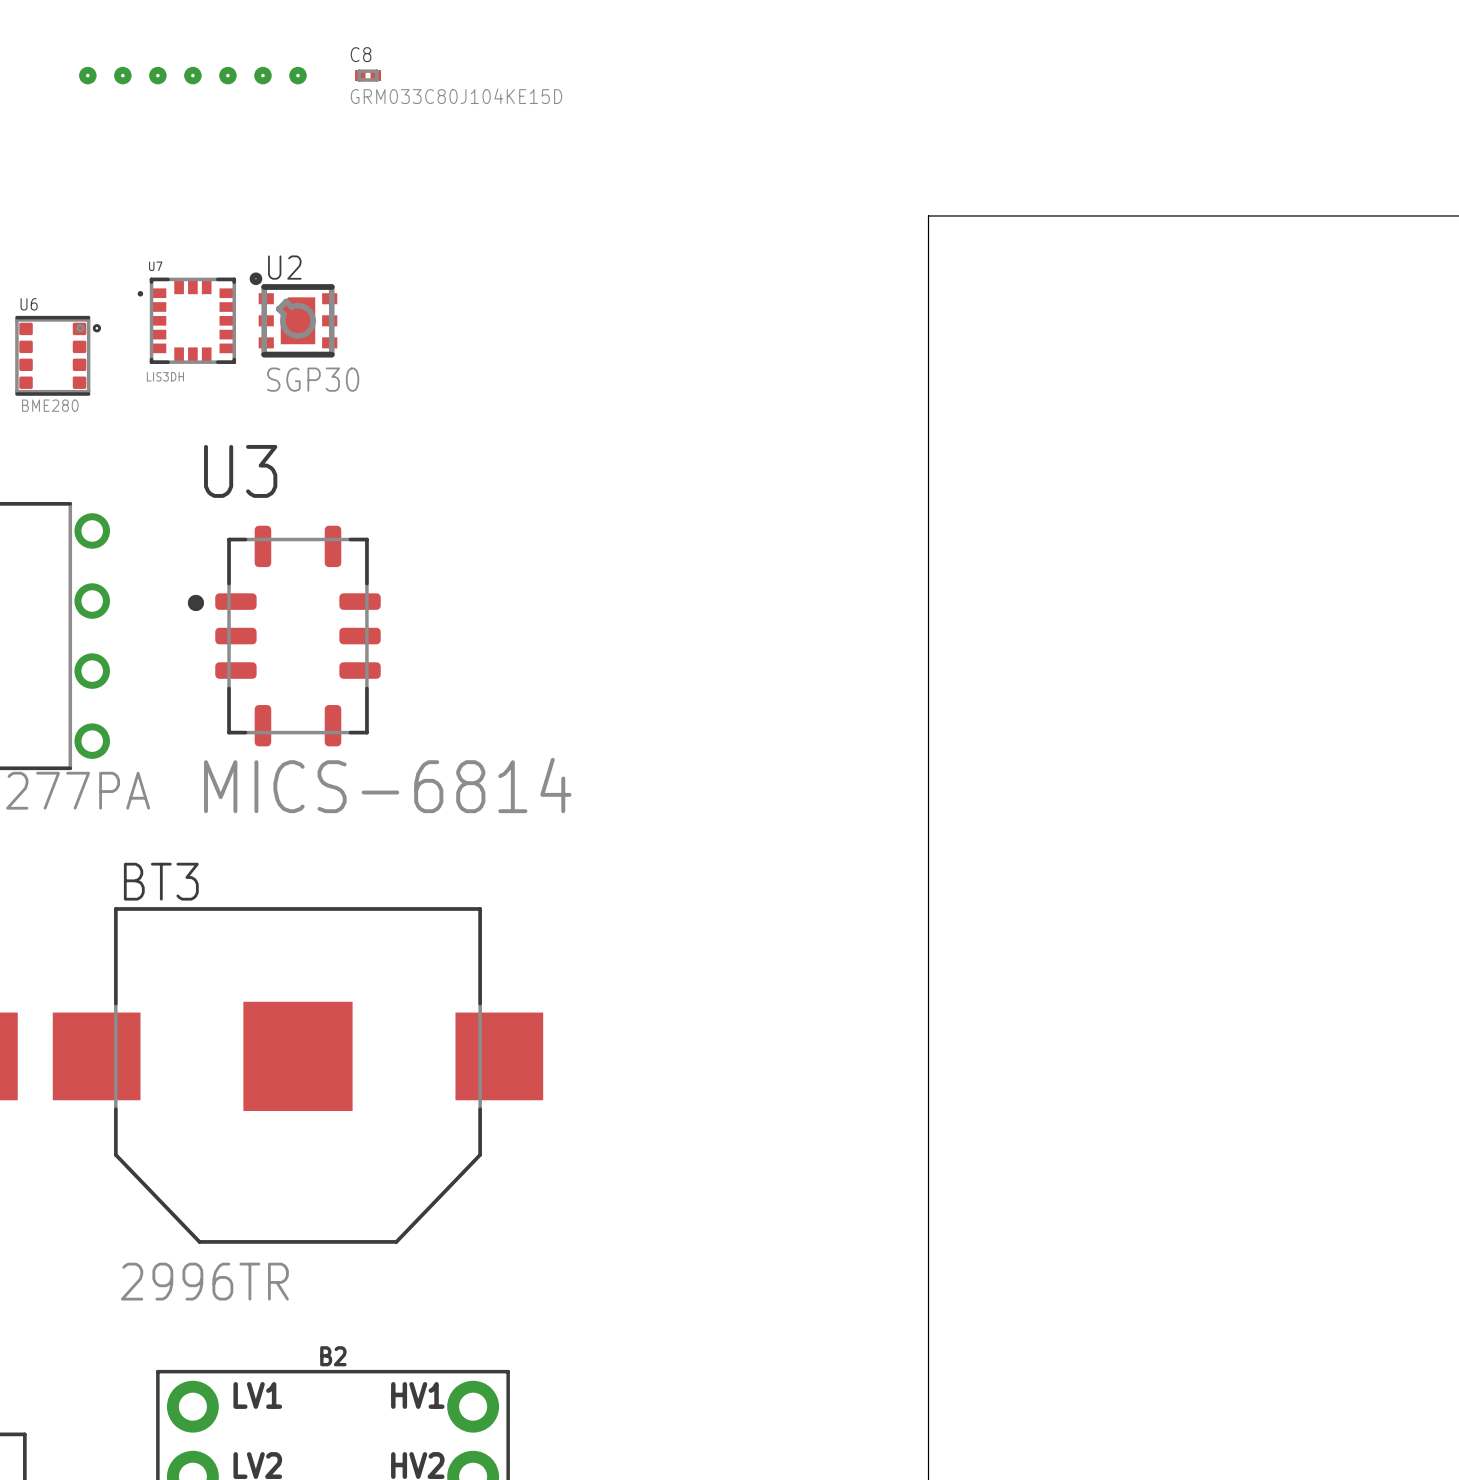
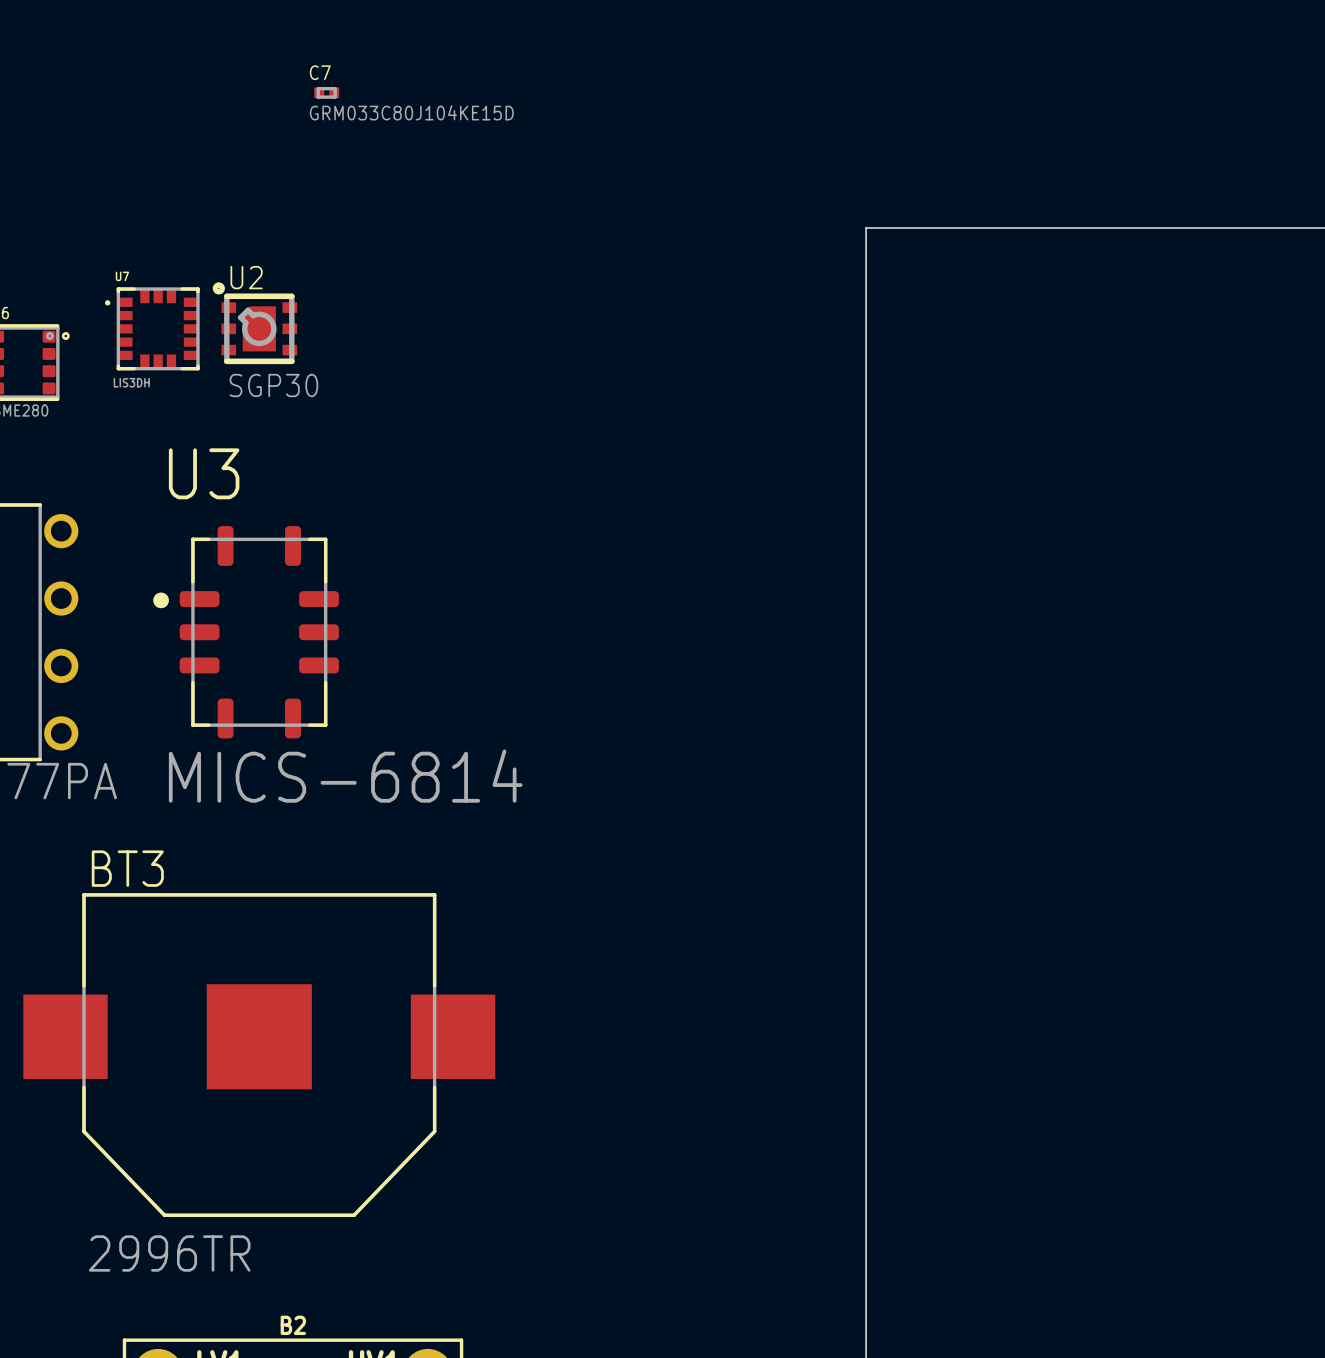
C8 name: C8 (361, 54) -> C7 (320, 72)
part: (192, 75) -> none

